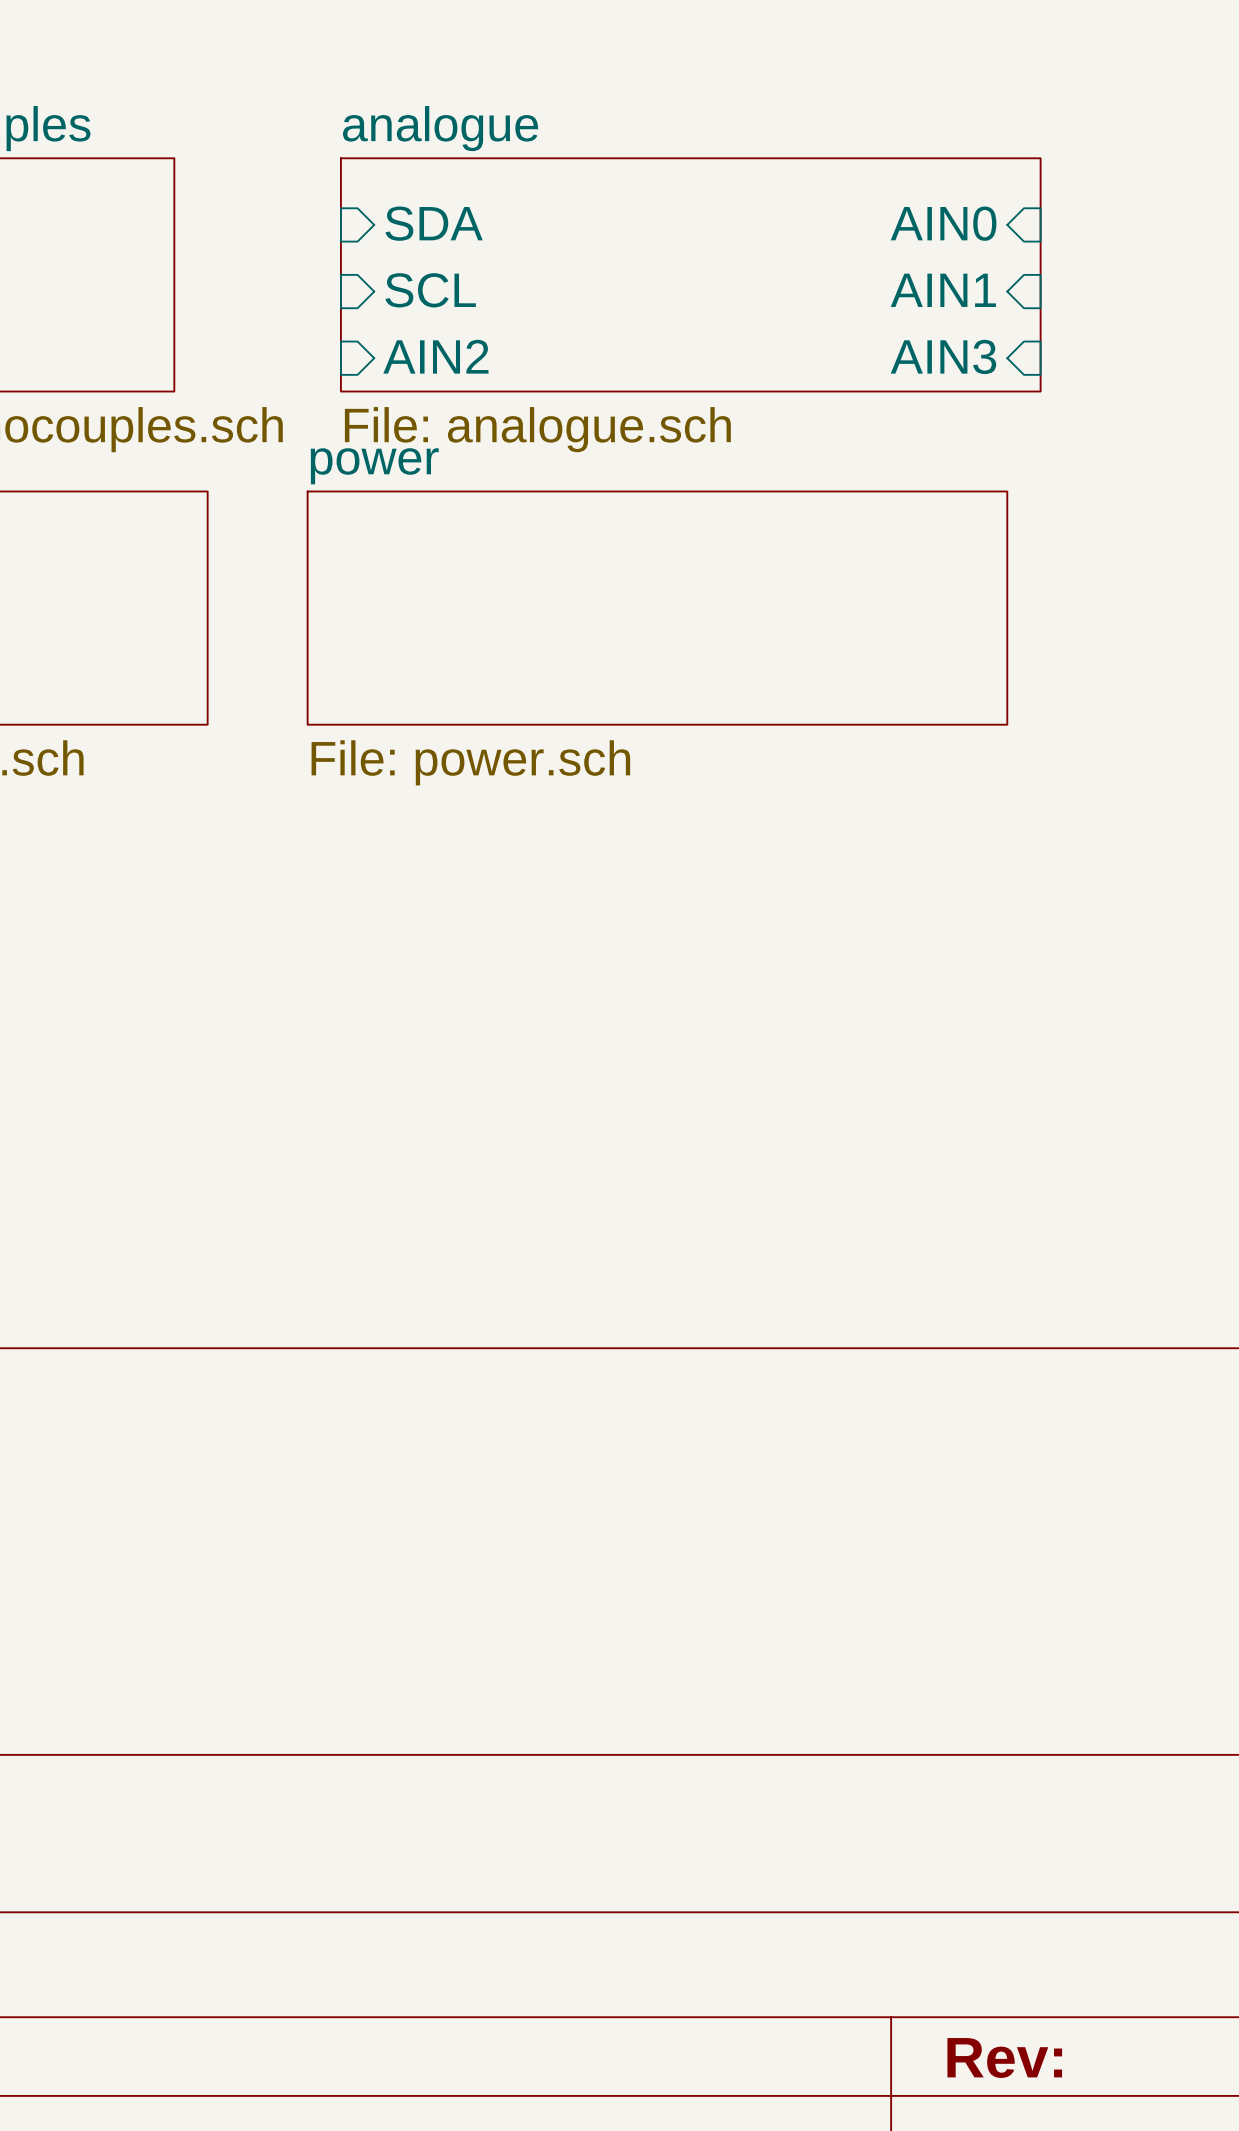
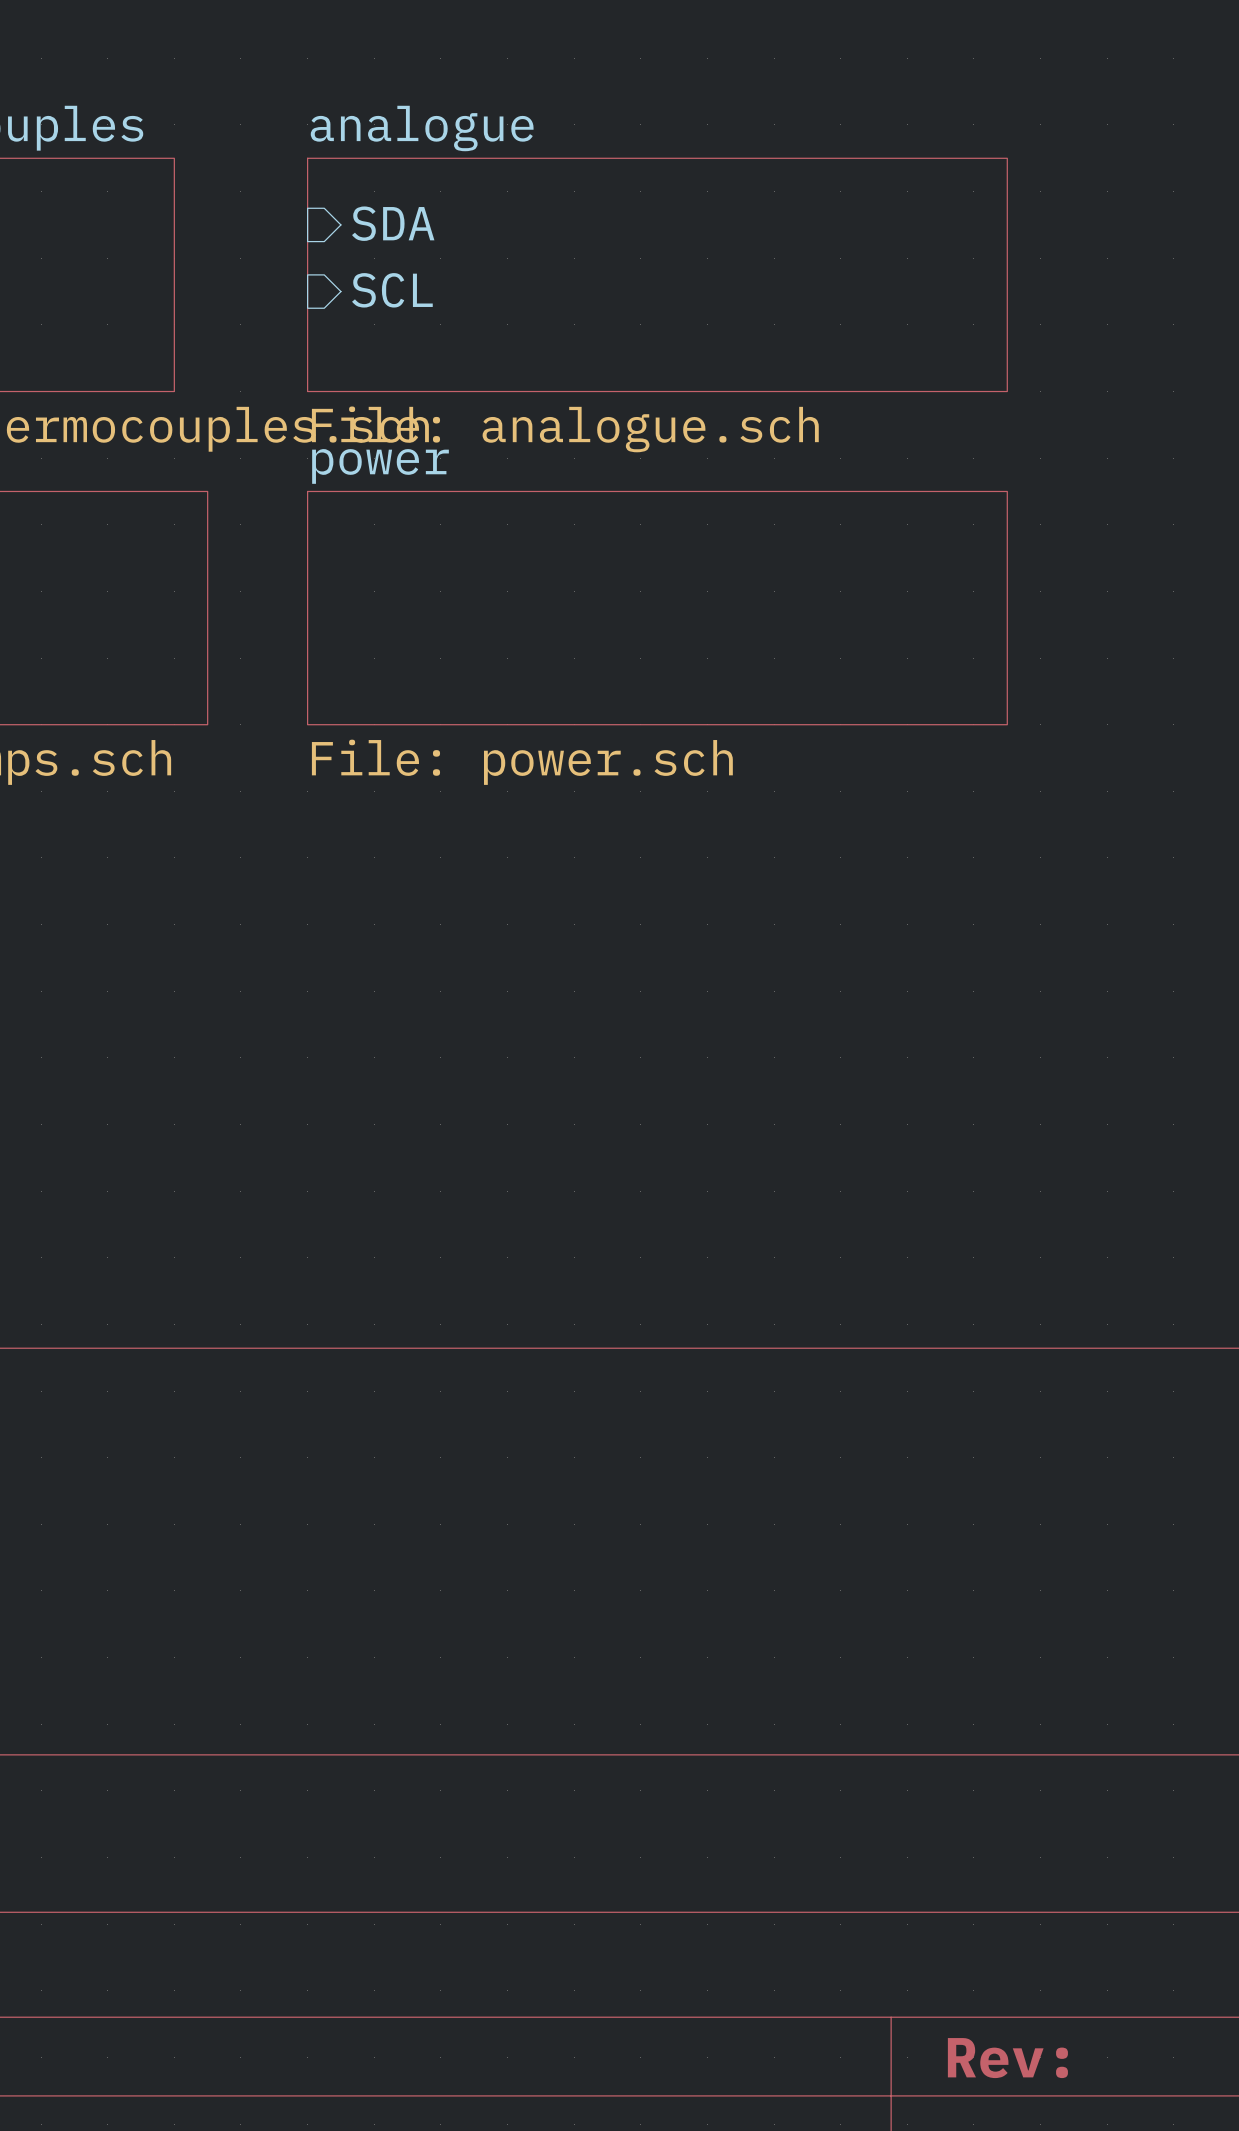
sheet pin position: SDA (434, 223) -> SDA (393, 223)
sheet pin: AIN0 (943, 223) -> none
sheet analogue position: (690, 274) -> (657, 274)
sheet pin position: SCL (430, 290) -> SCL (392, 290)
sheet pin: AIN1 (943, 290) -> none
sheet pin: AIN2 (435, 356) -> none
sheet pin: AIN3 (943, 356) -> none

